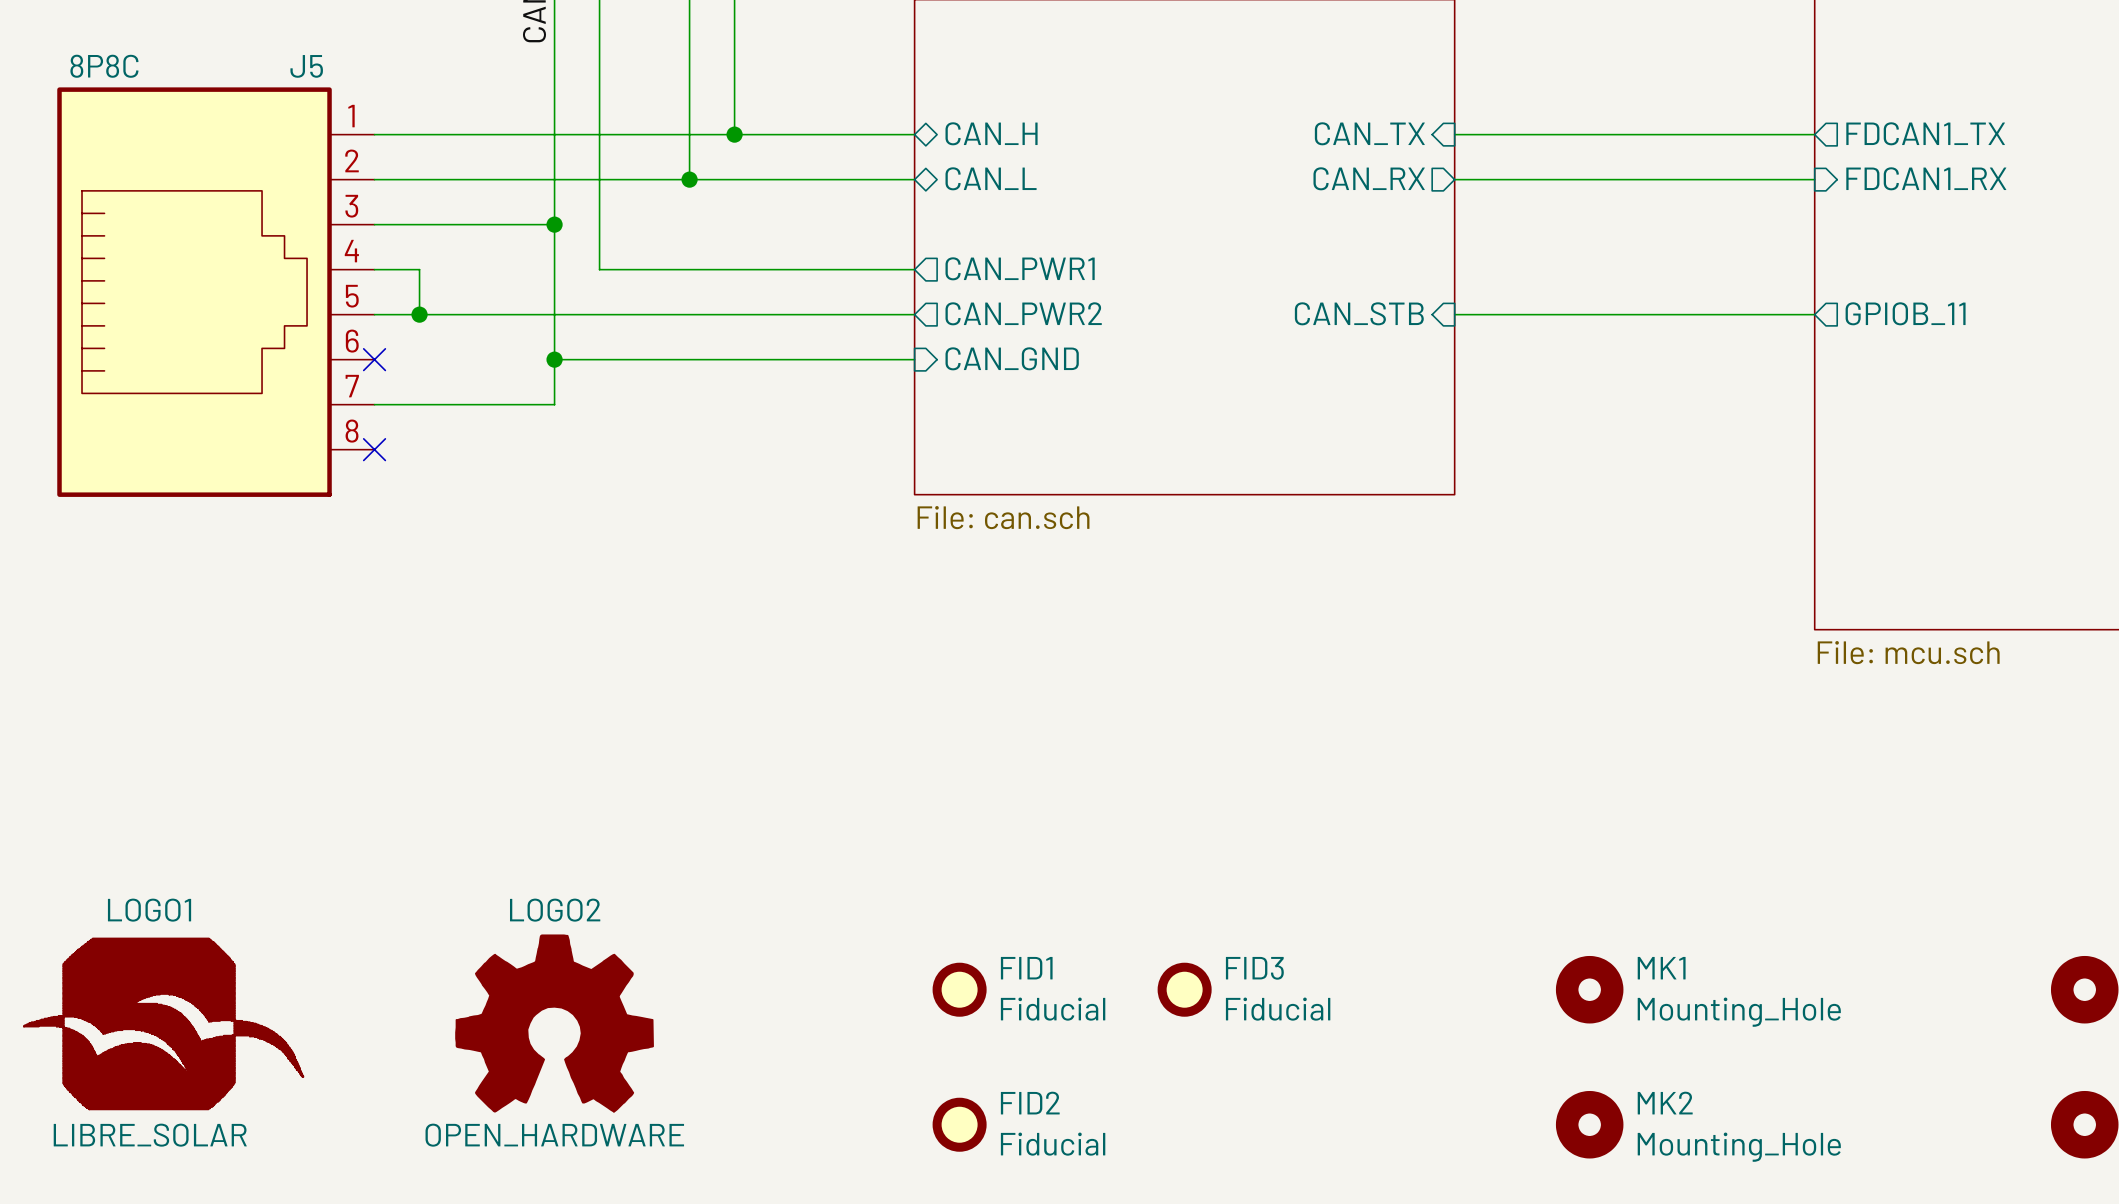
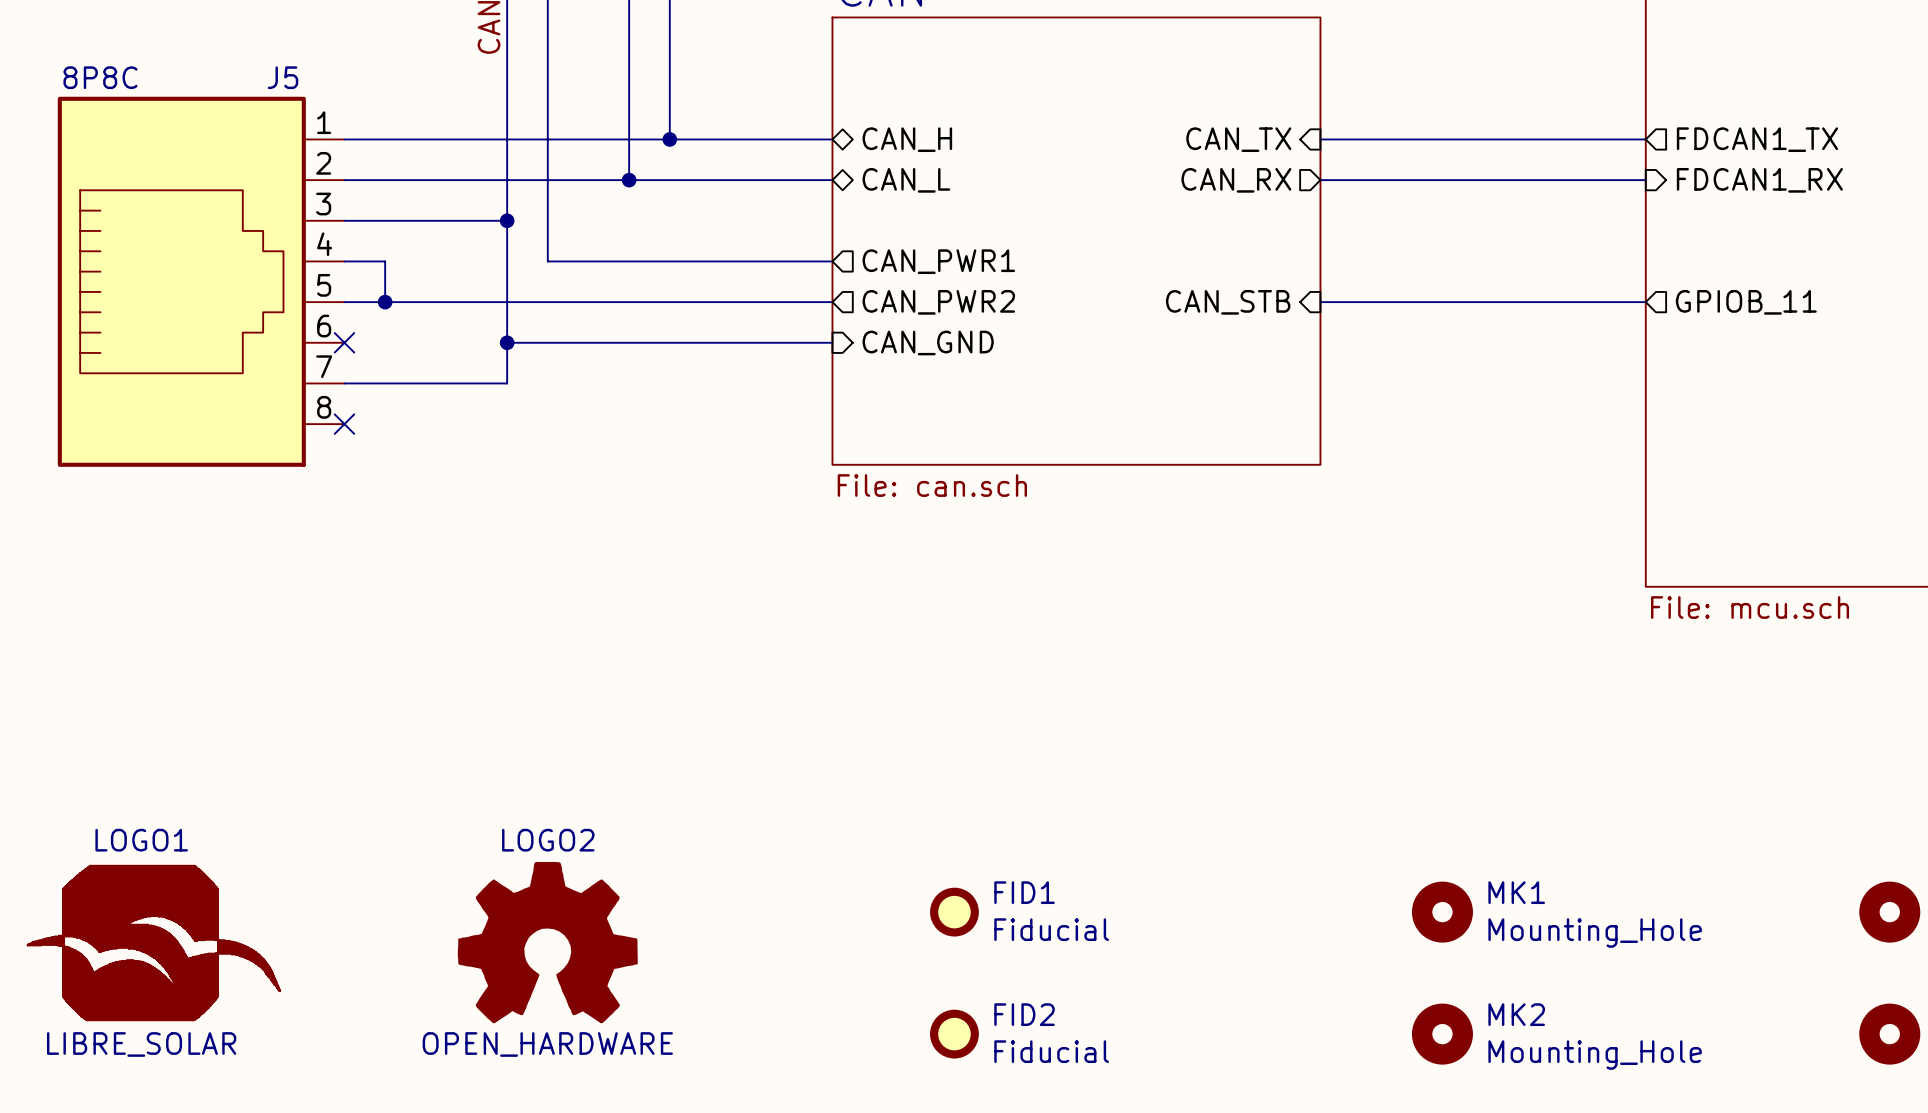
FID1 position: (959, 989) -> (954, 912)
FID3: Fiducial (1184, 989) -> none
LOGO2 position: (554, 1023) -> (547, 942)
FID2 position: (959, 1124) -> (954, 1034)

